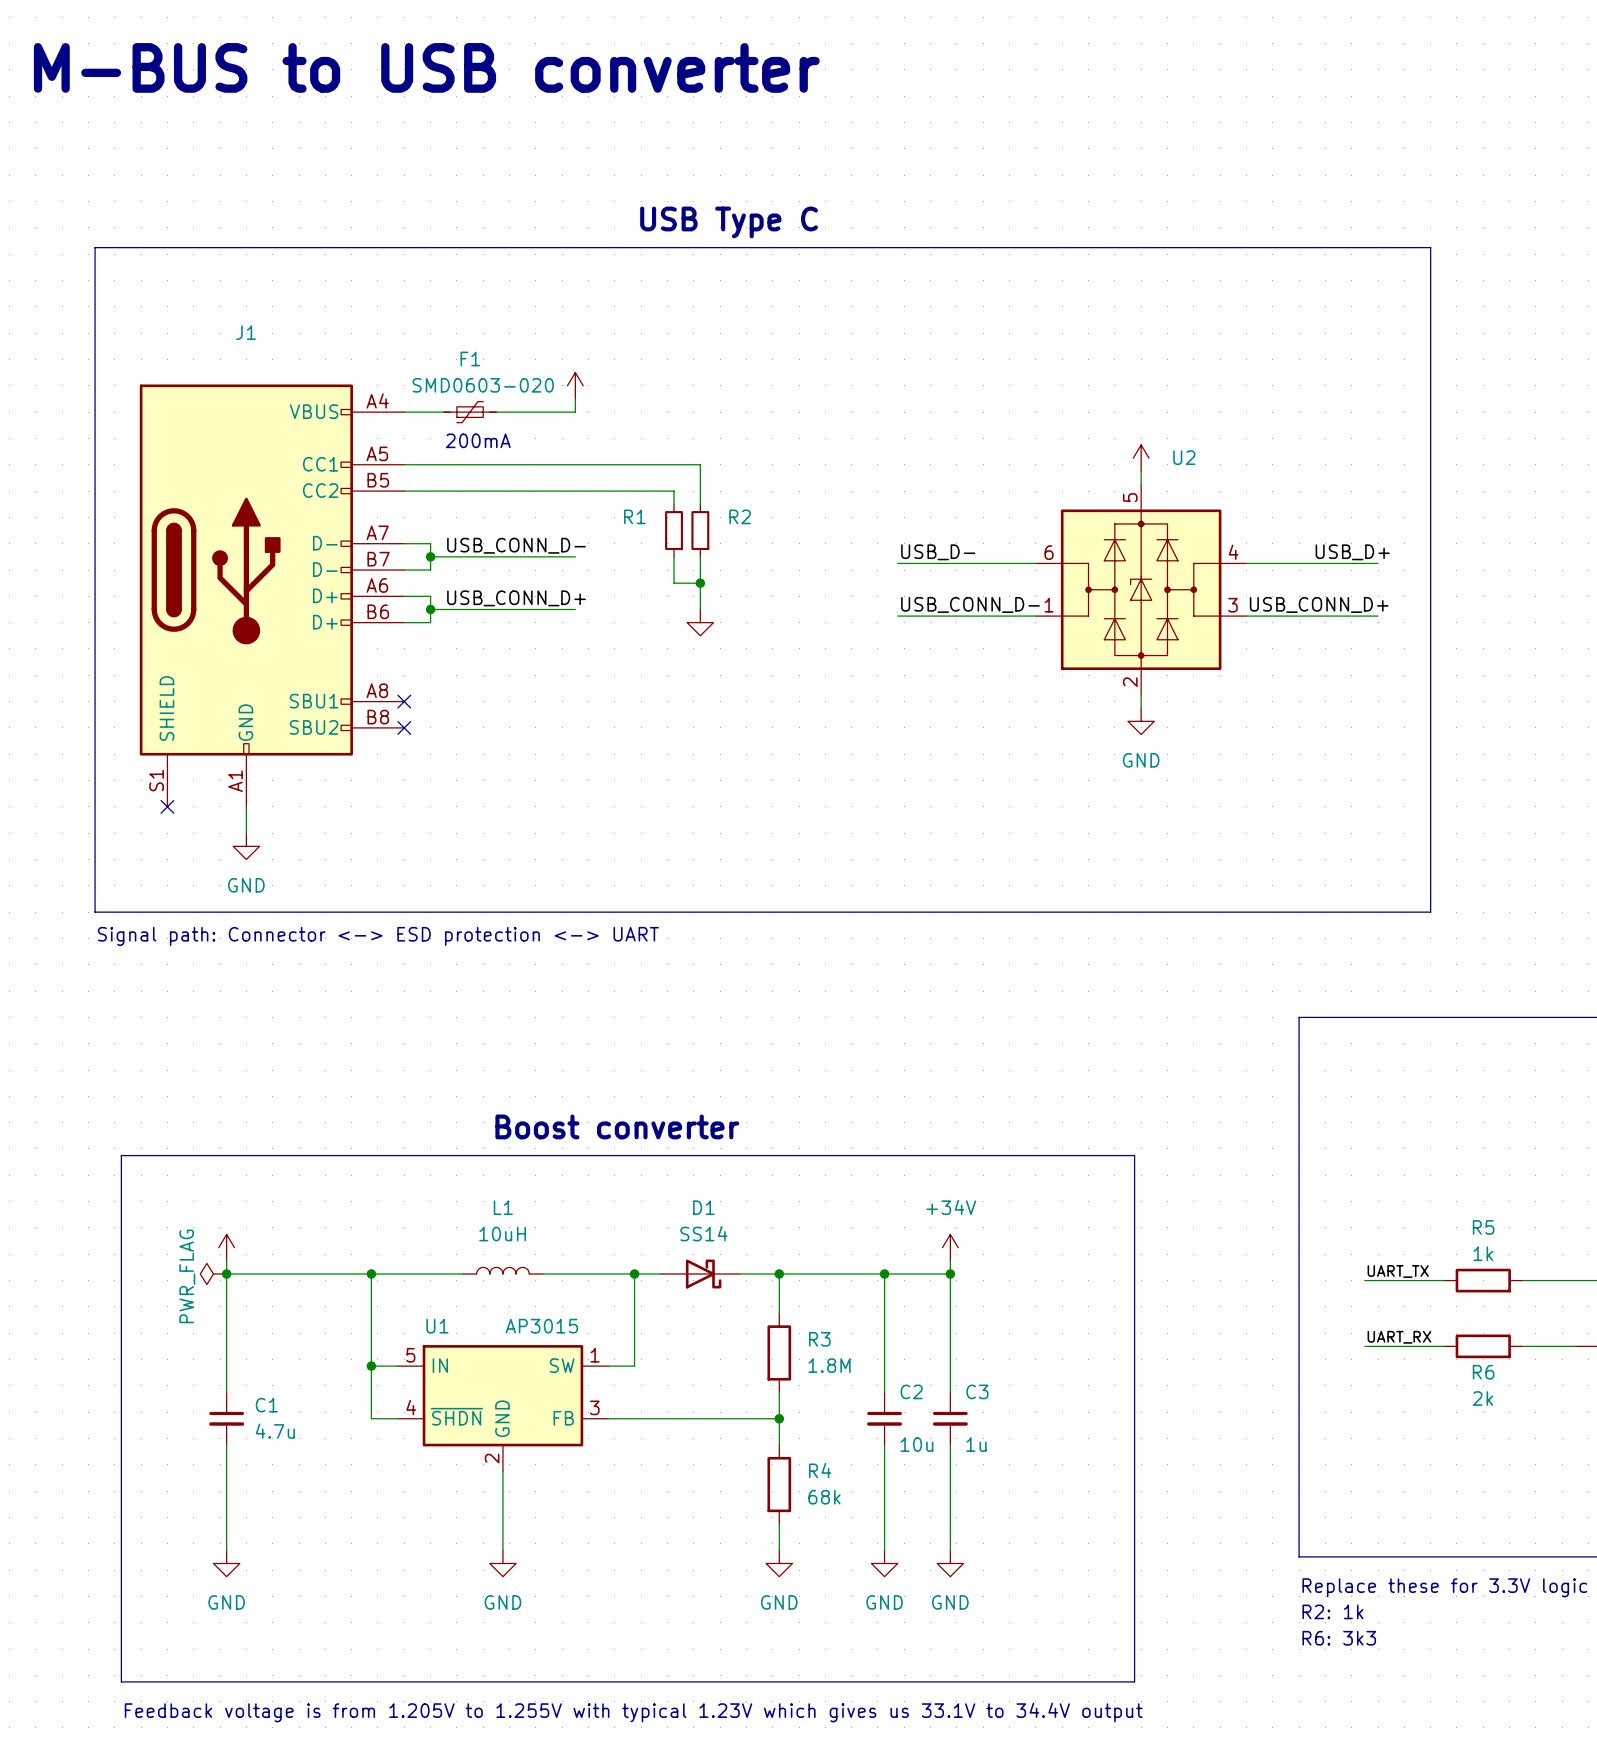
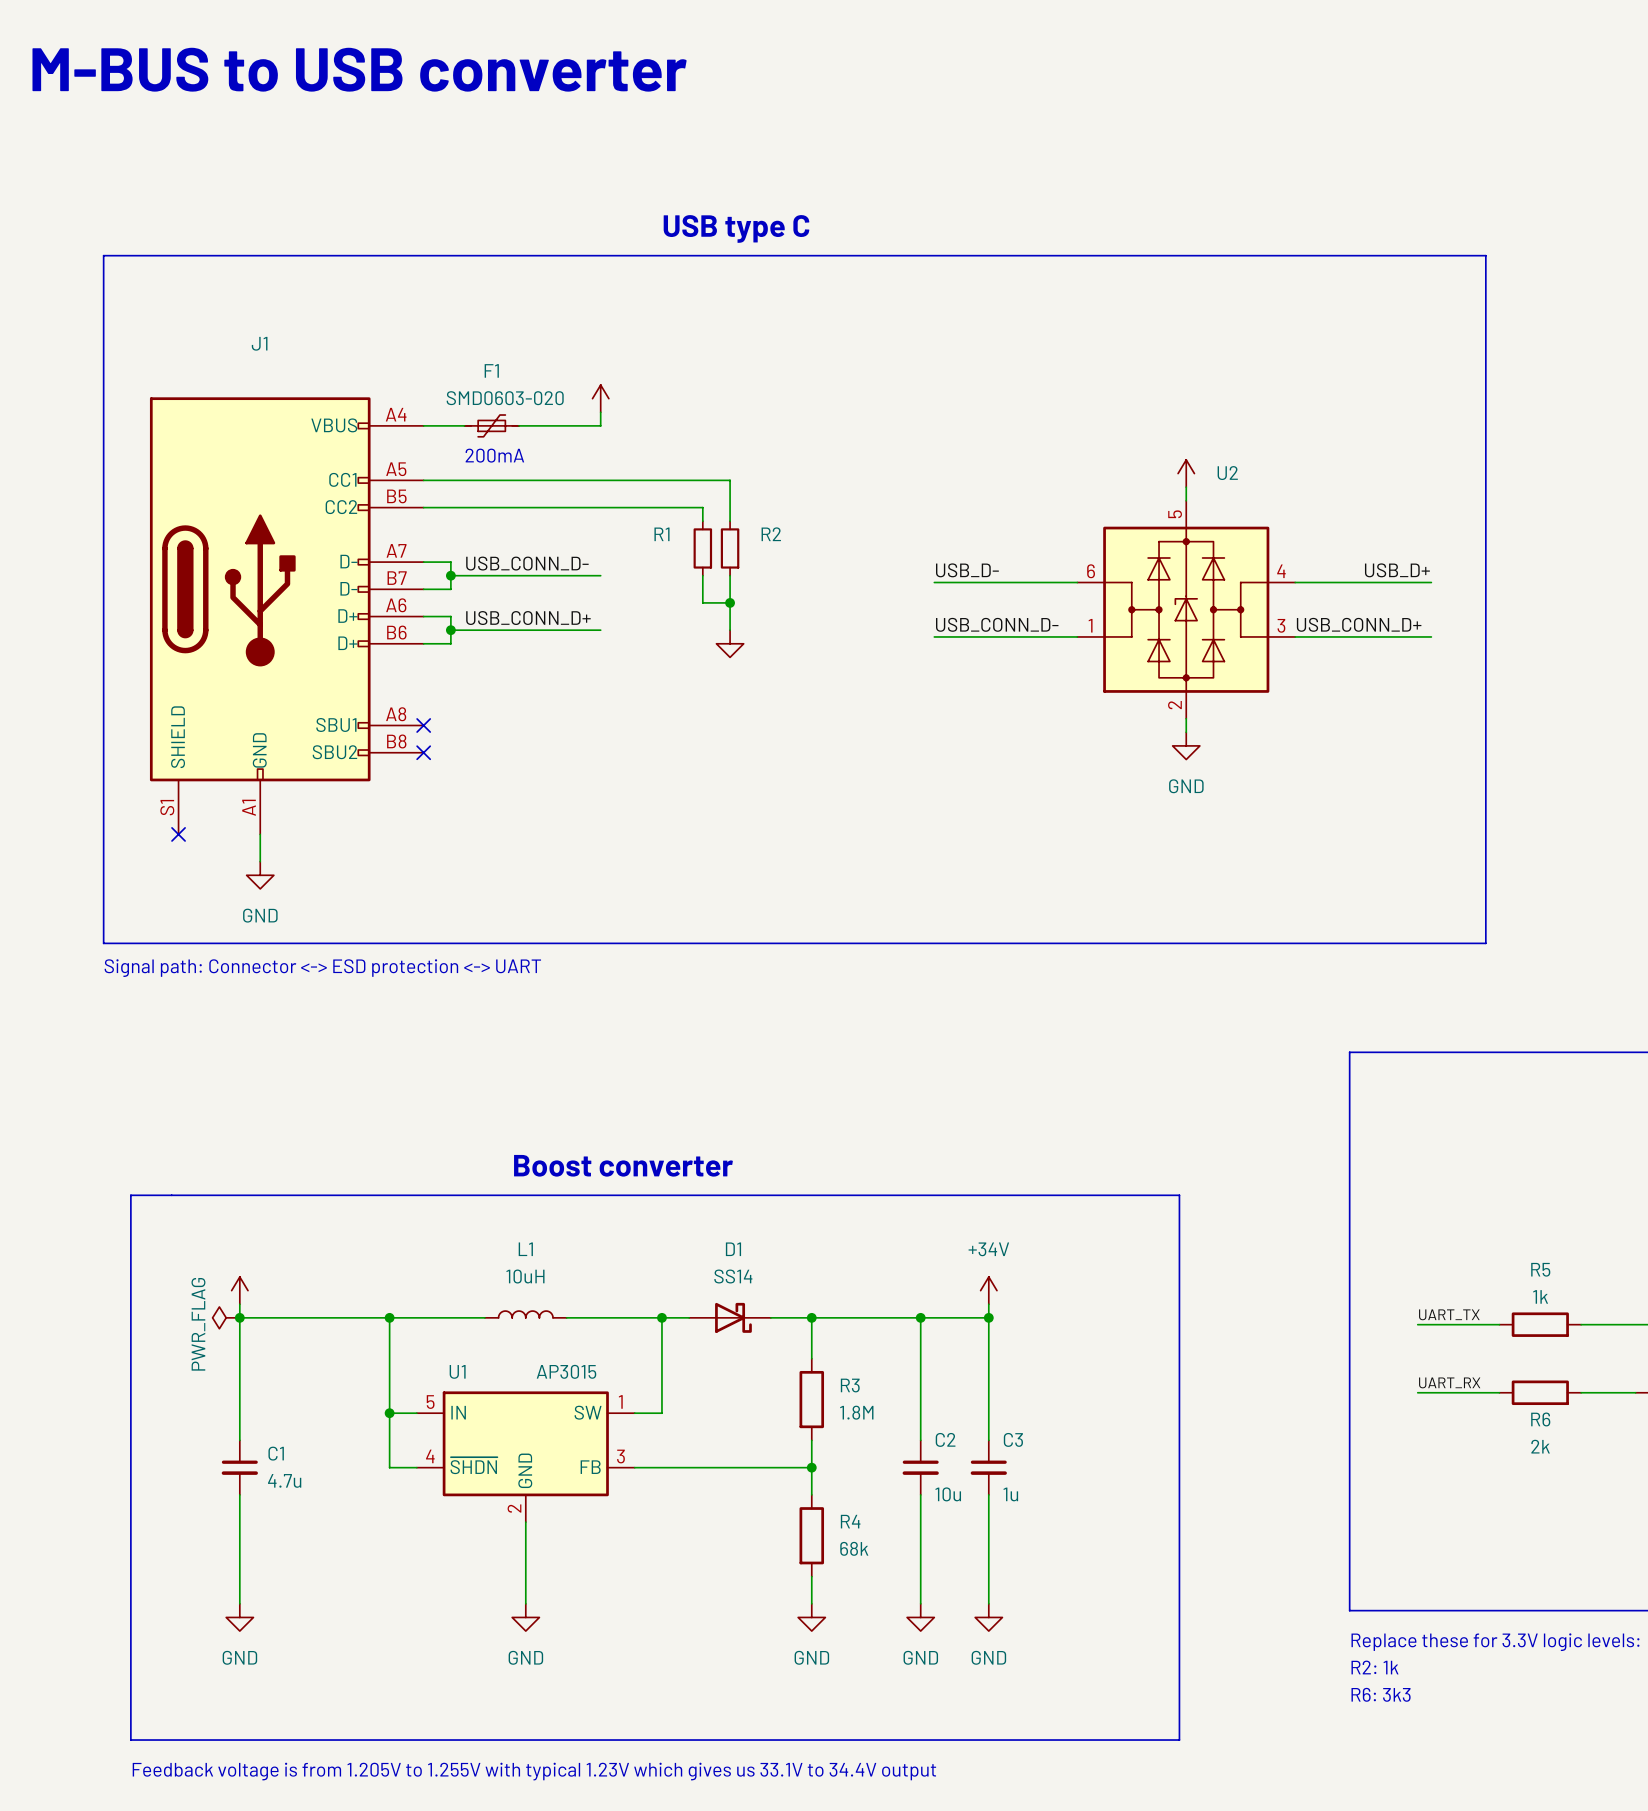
text: USB Type C (729, 222) -> USB type C (736, 228)

